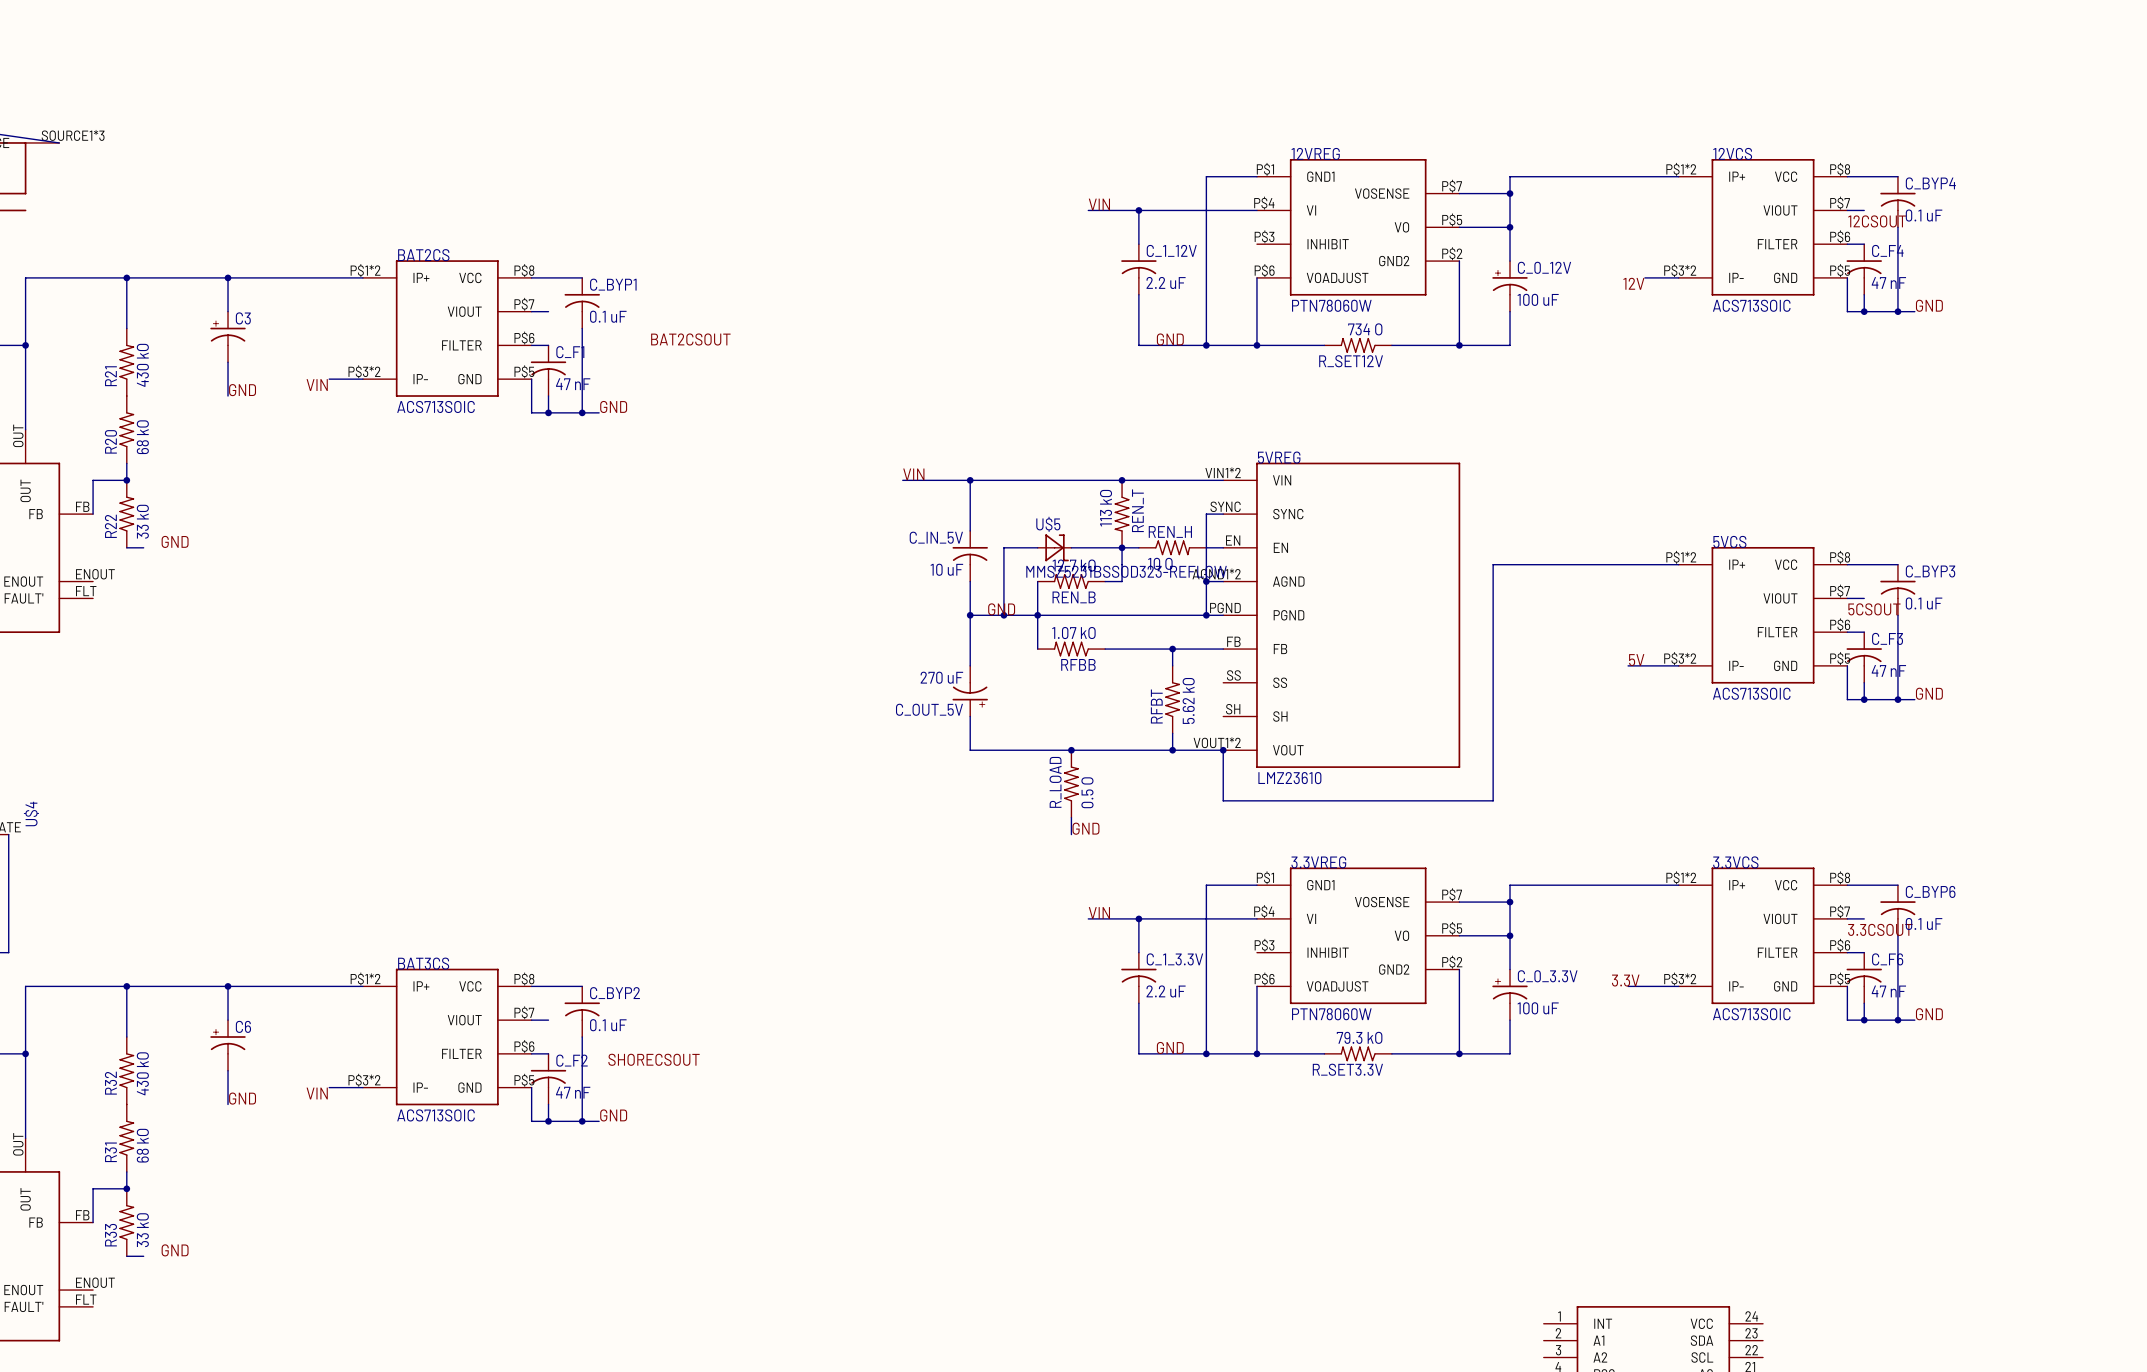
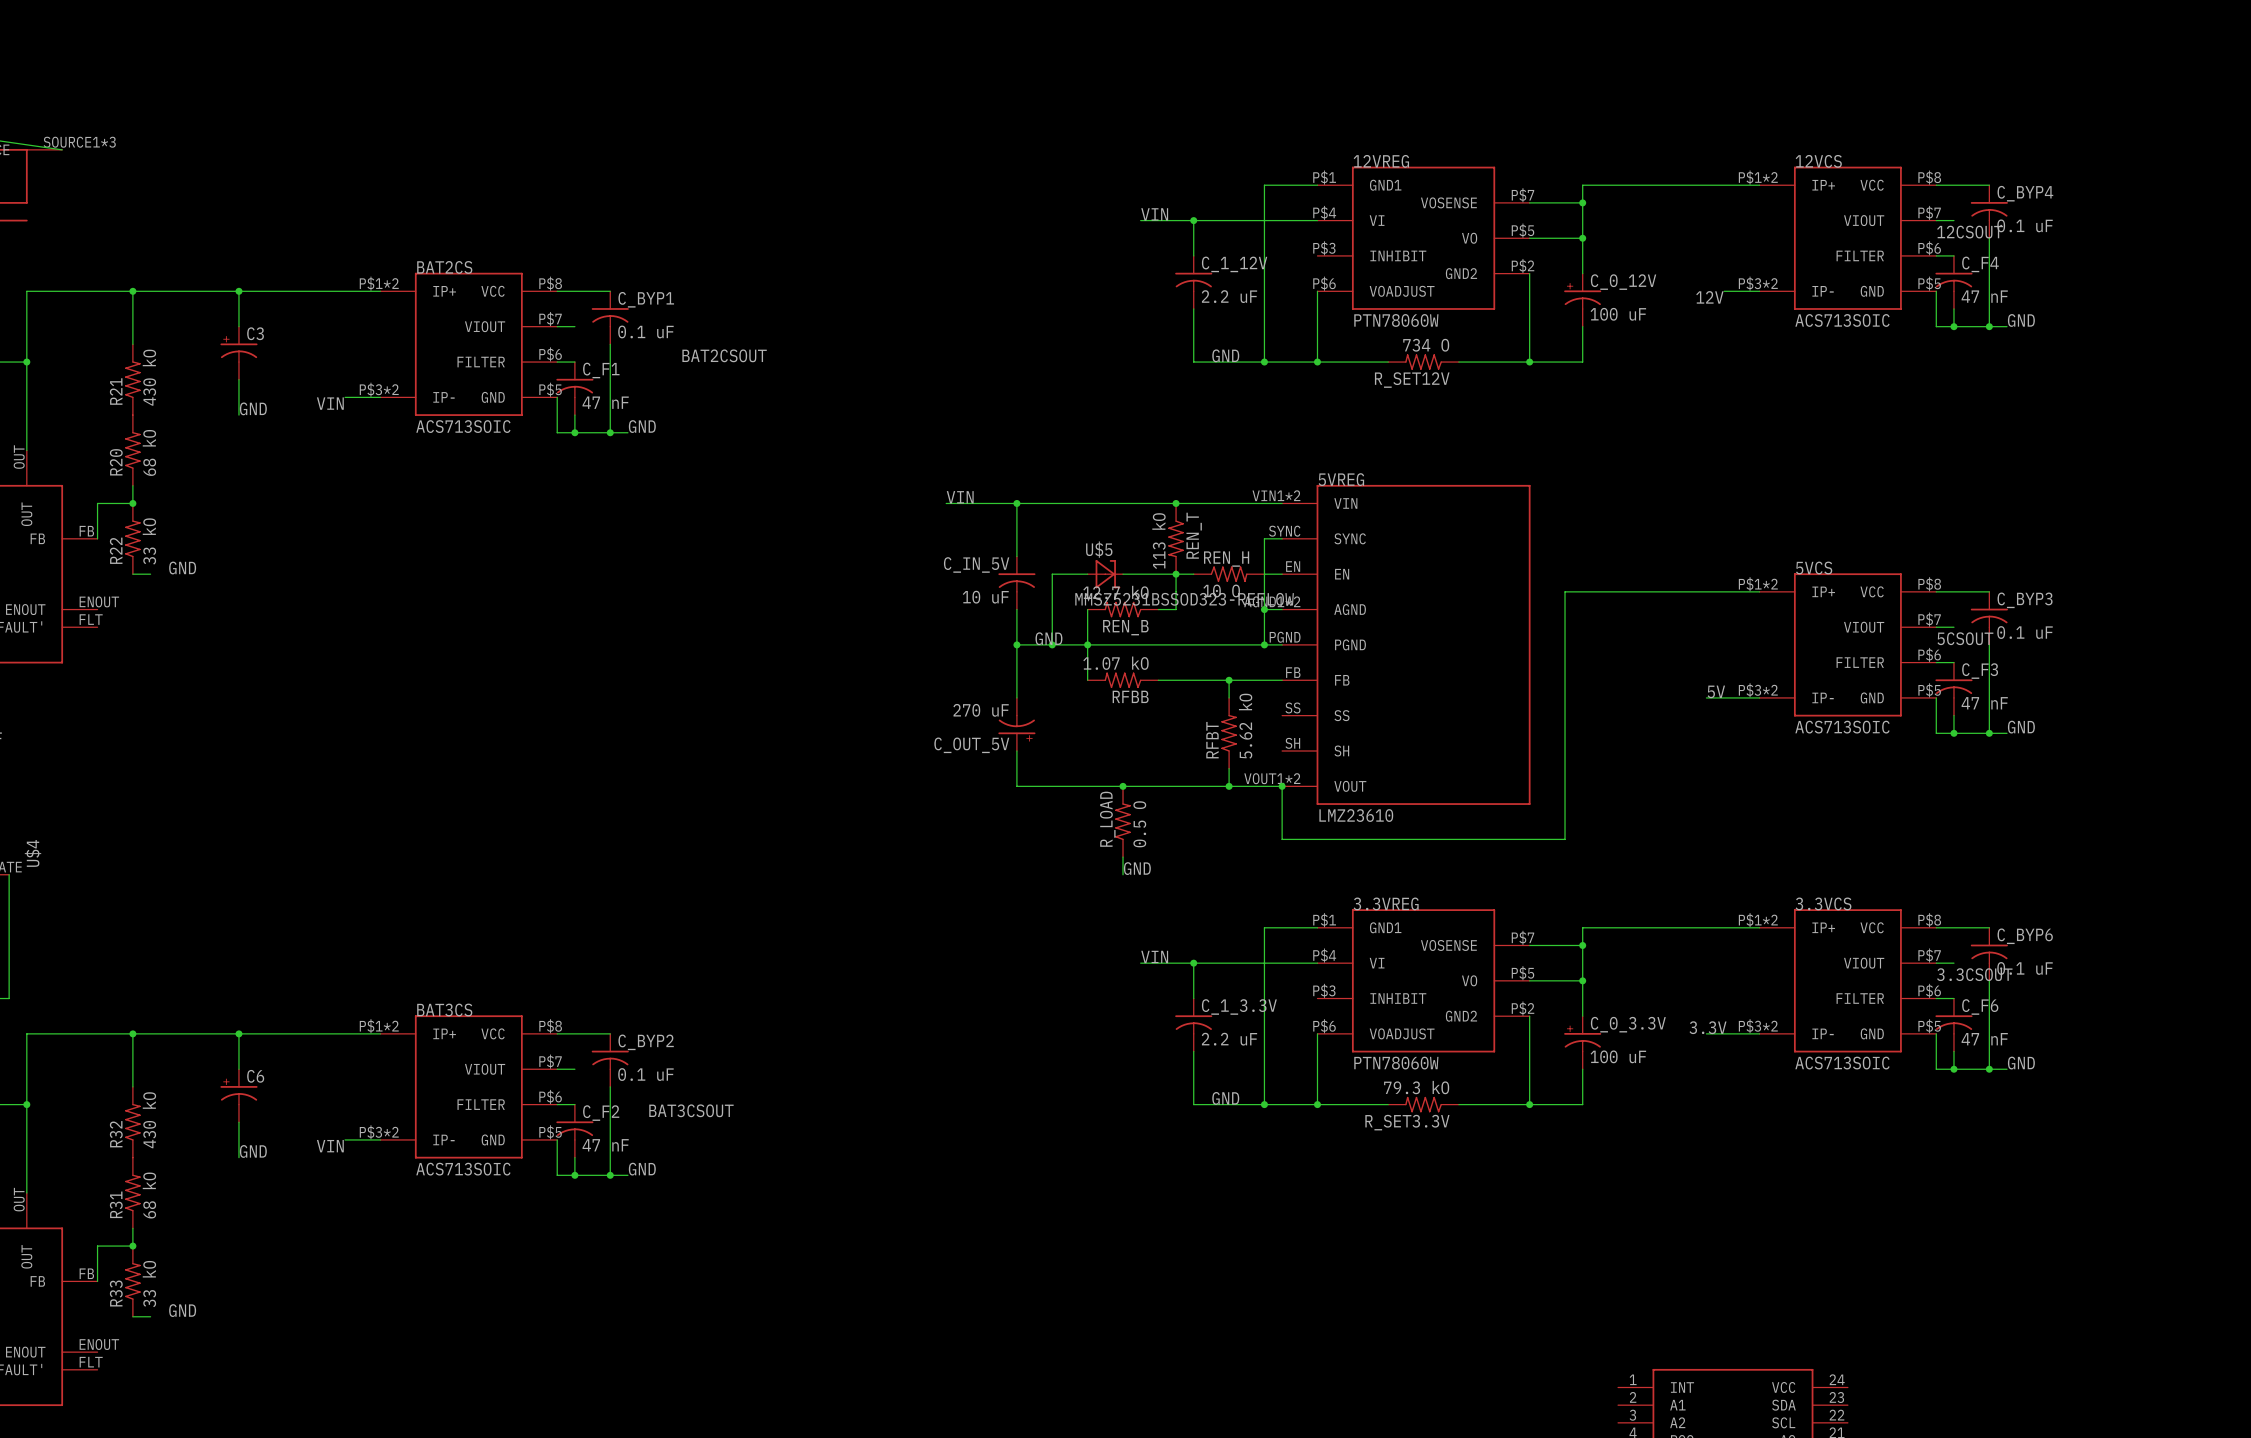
label: SHORECSOUT (654, 1059) -> BAT3CSOUT (691, 1110)

